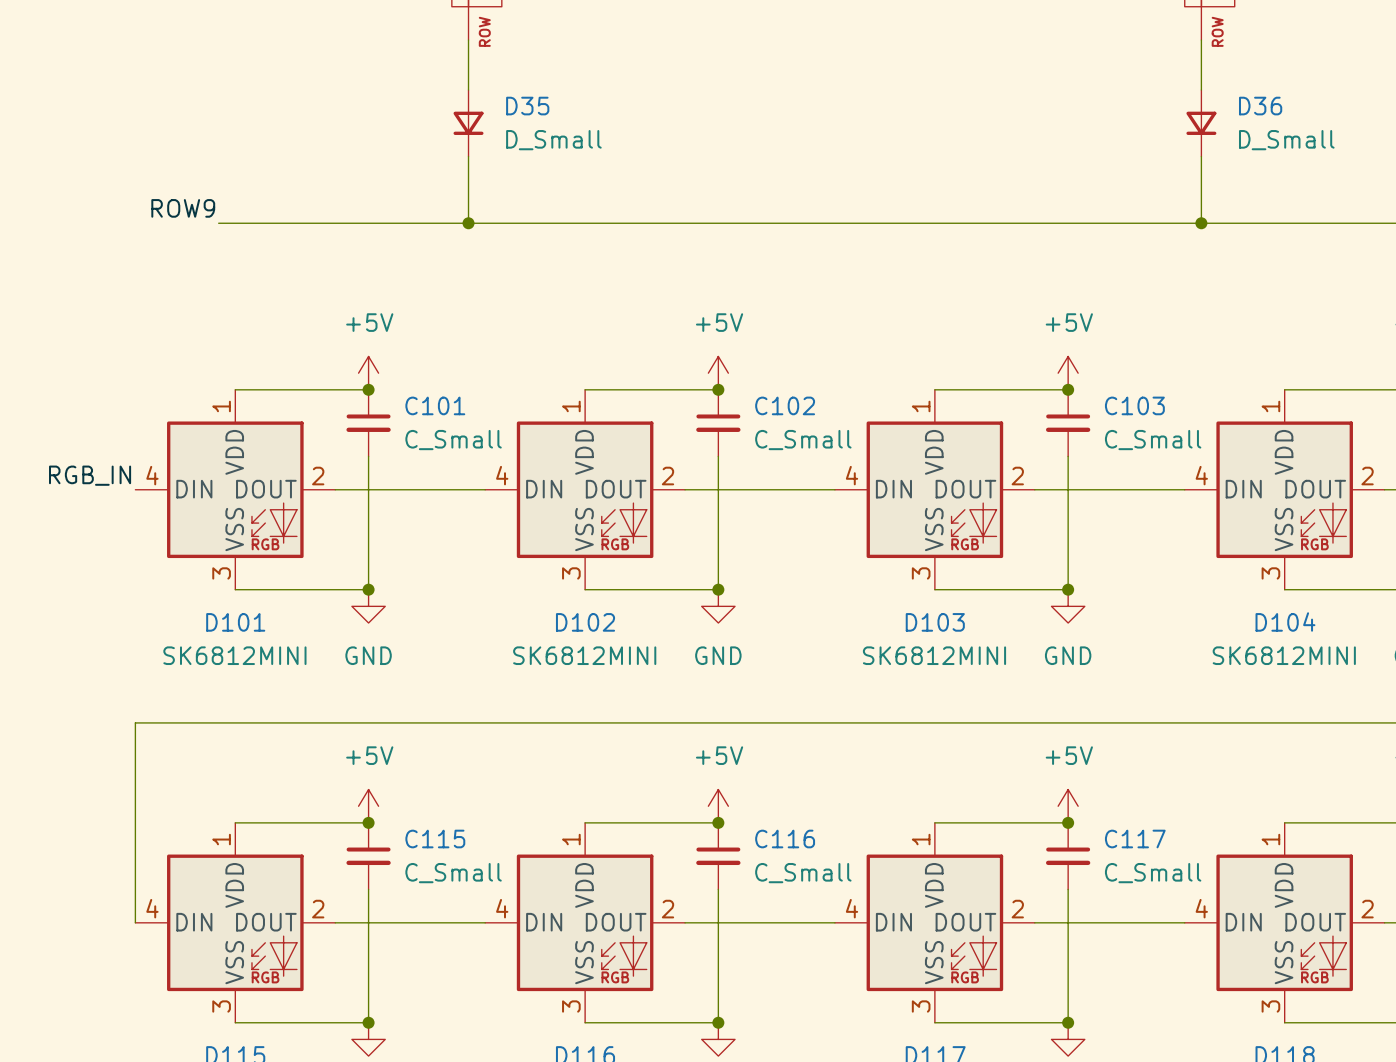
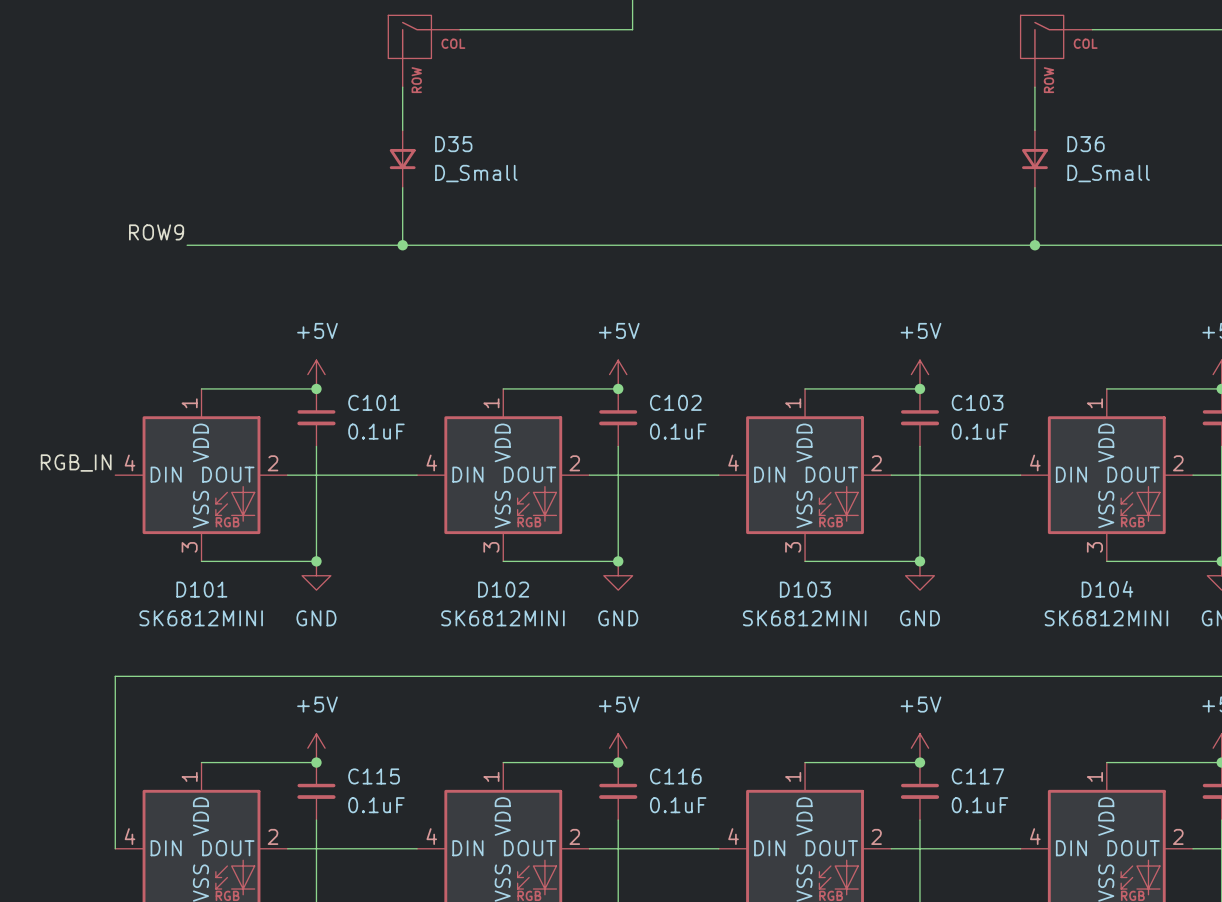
C101 value: C_Small (453, 440) -> 0.1uF (376, 431)
C102 value: C_Small (803, 440) -> 0.1uF (678, 431)
C103 value: C_Small (1153, 440) -> 0.1uF (979, 431)
C115 value: C_Small (453, 873) -> 0.1uF (376, 805)
C116 value: C_Small (803, 873) -> 0.1uF (678, 805)
C117 value: C_Small (1153, 873) -> 0.1uF (979, 805)

